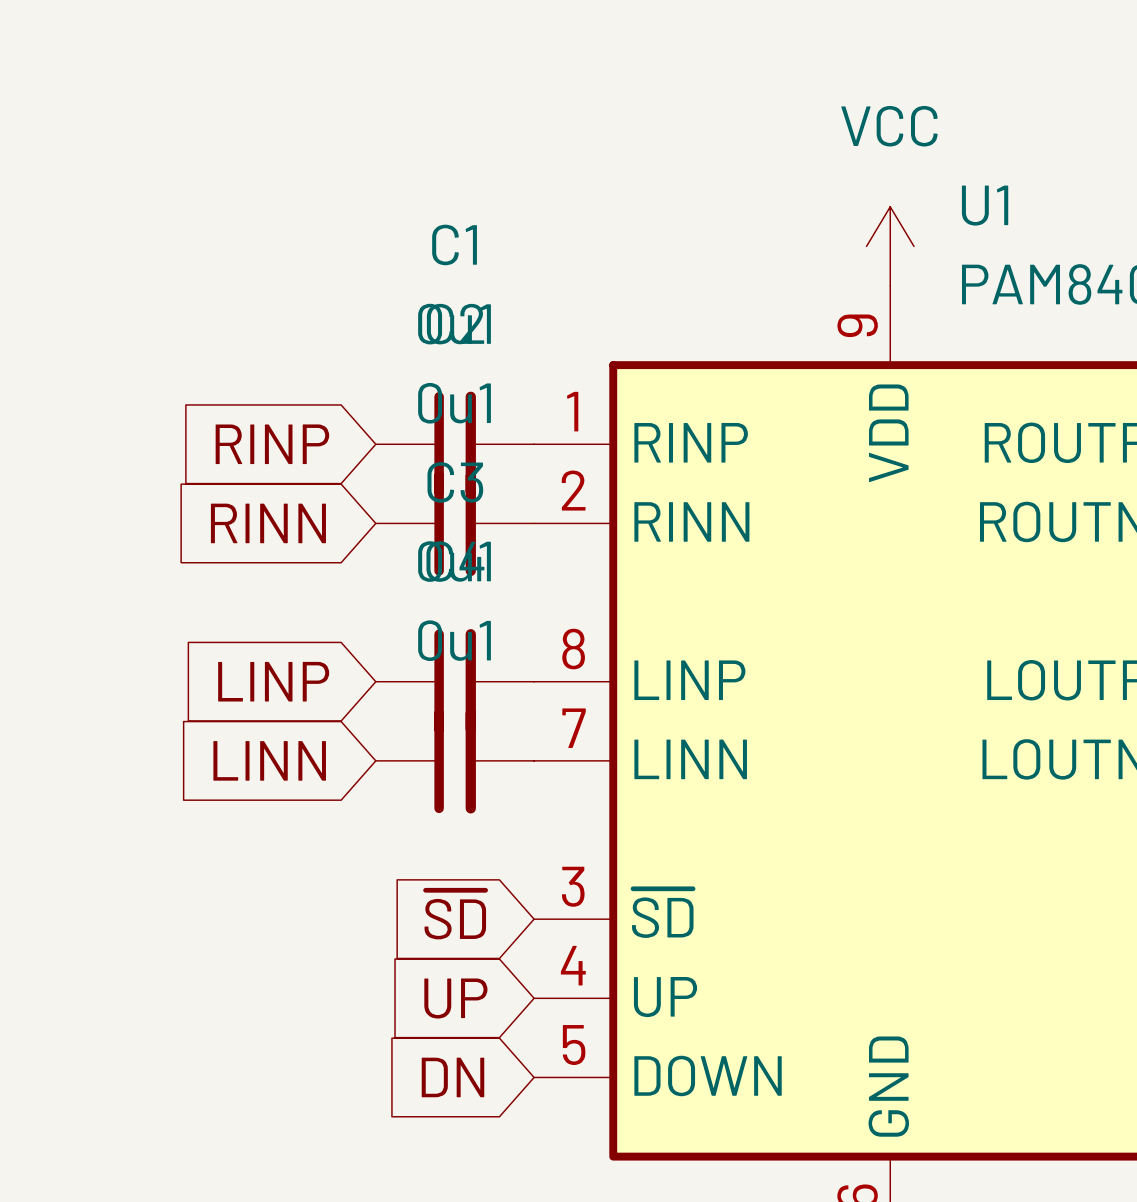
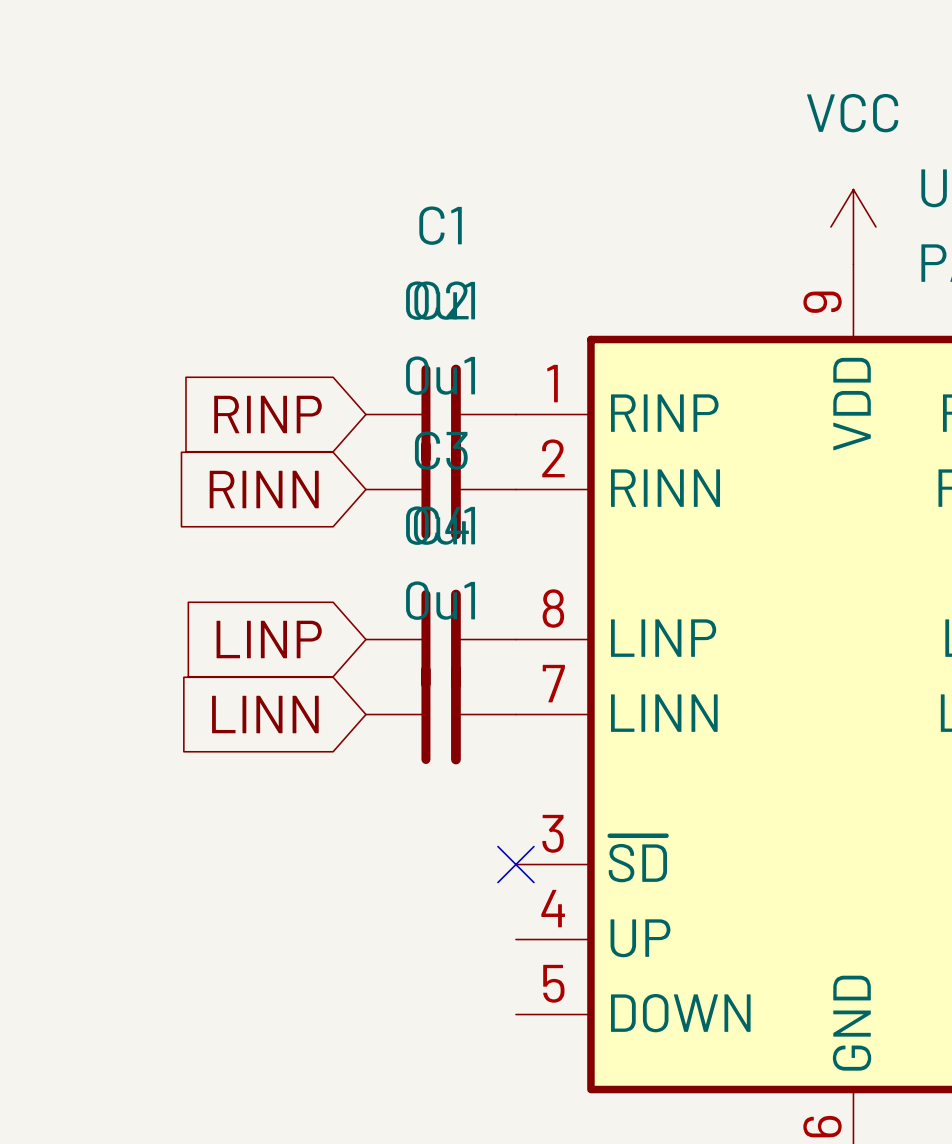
global label: ~{SD} (455, 914) -> none
no-connect mark: none -> (515, 864)
global label: UP (455, 998) -> none
global label: DN (453, 1077) -> none

